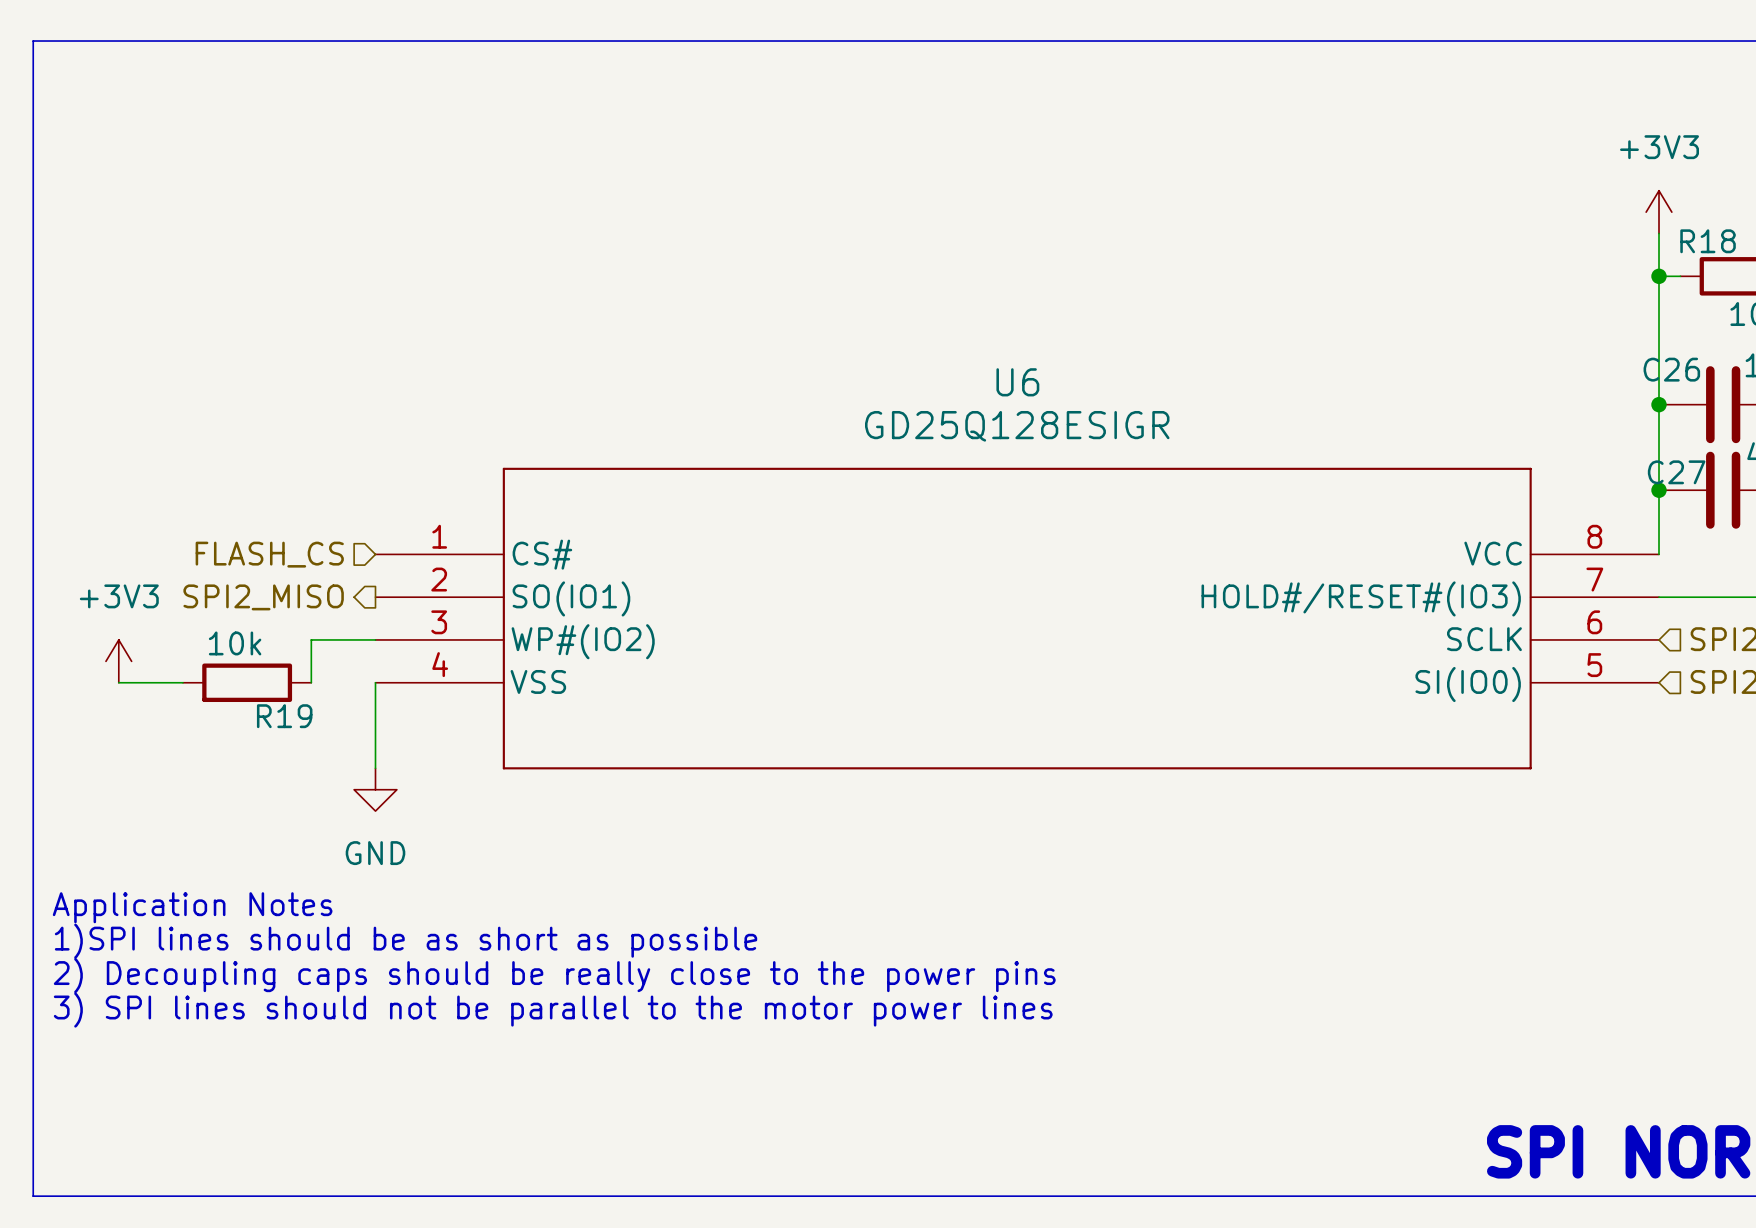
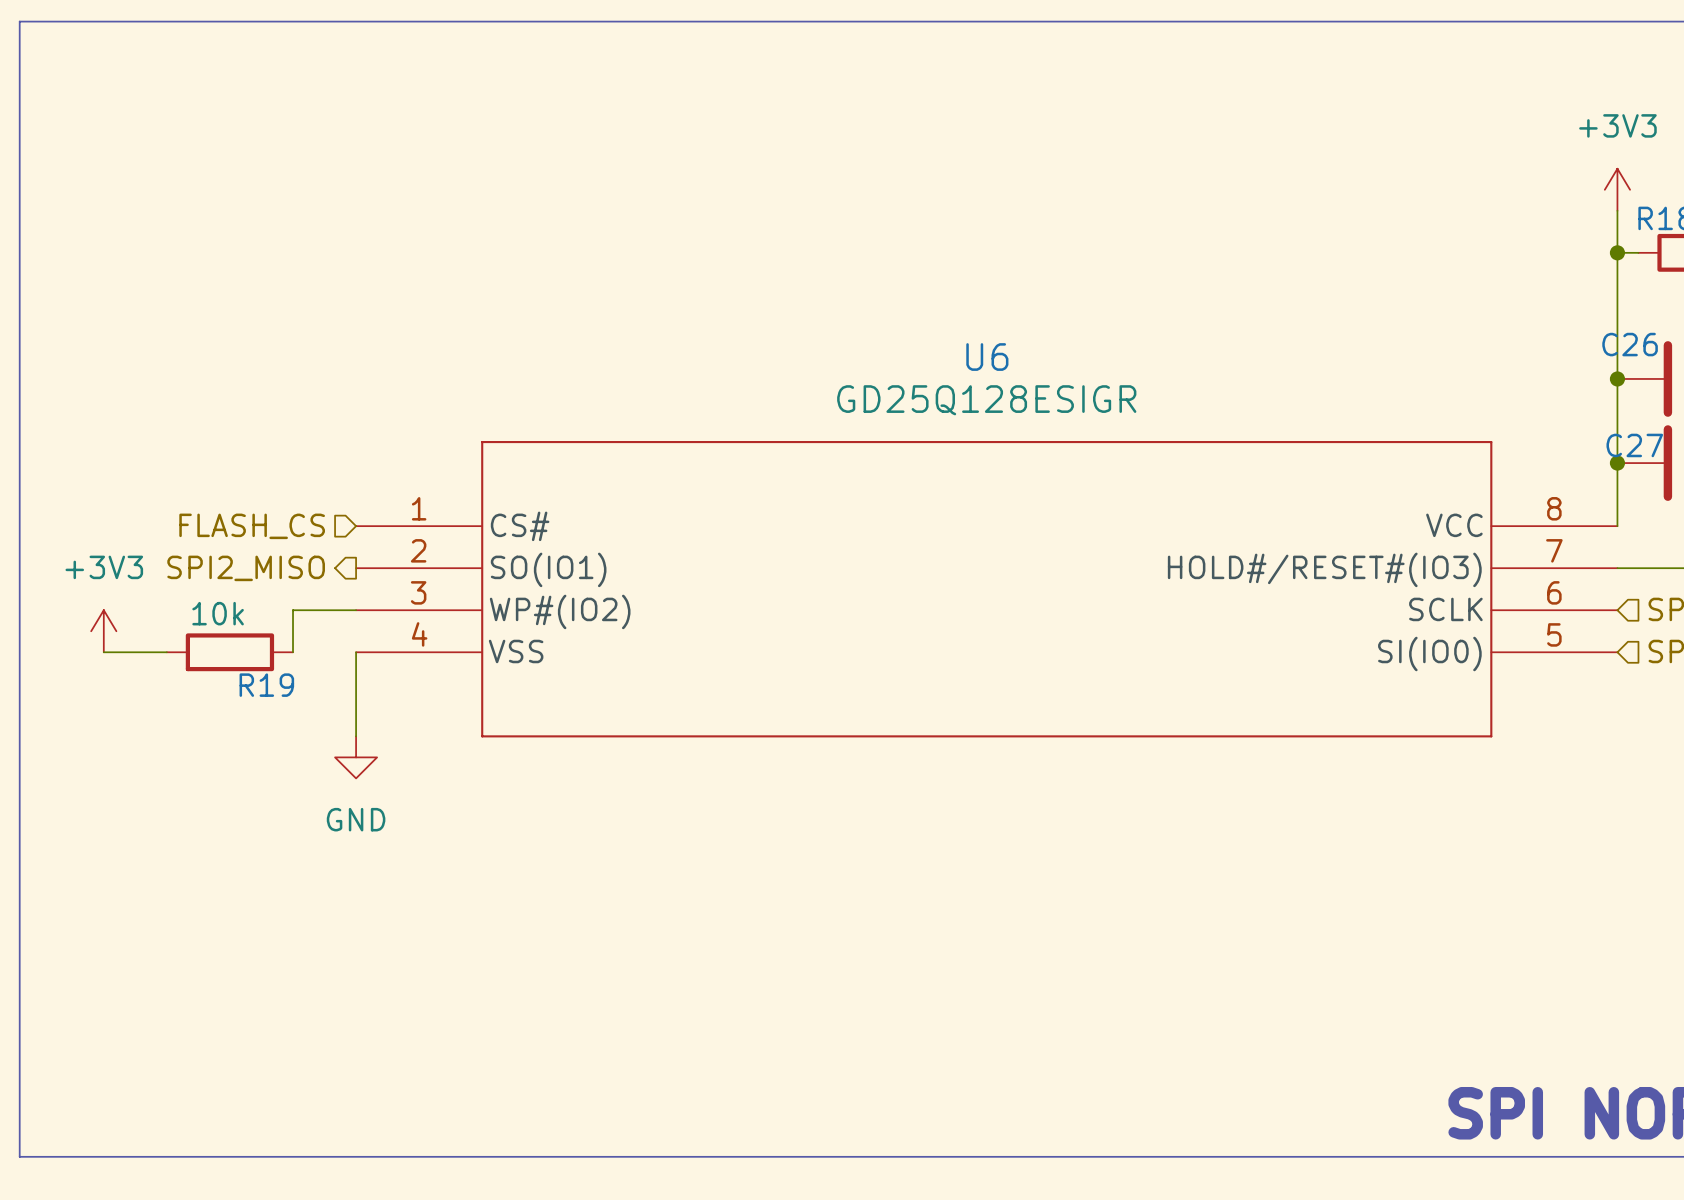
text: Application Notes (192, 907) -> none
text: 1)SPI lines should be as short as possible (406, 941) -> none
text: 2) Decoupling caps should be really close to the power pins (554, 975) -> none
text: 3) SPI lines should not be parallel to the motor power lines (553, 1010) -> none

